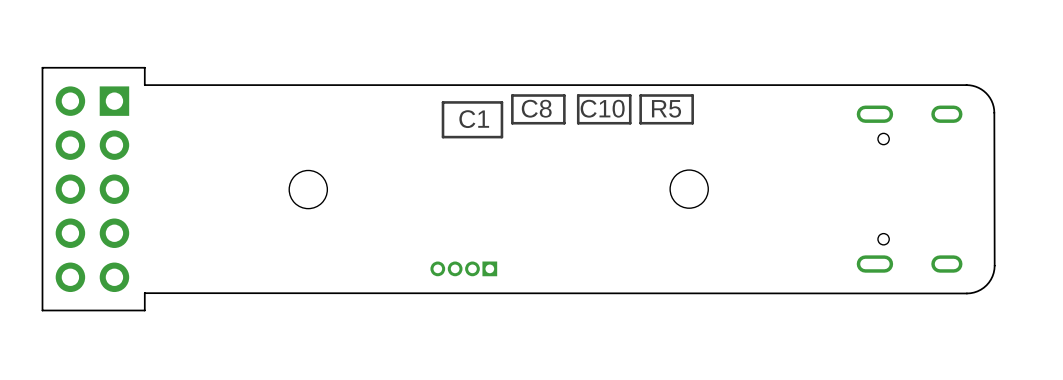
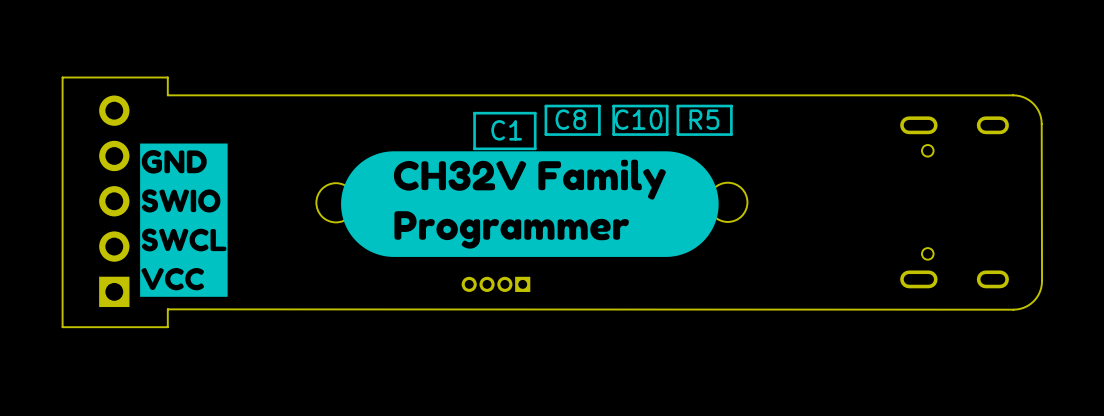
part footprint: [55, 86, 130, 293] -> [99, 95, 130, 308]
drawing: none -> [140, 143, 228, 297]
drawing: none -> [341, 151, 719, 257]

